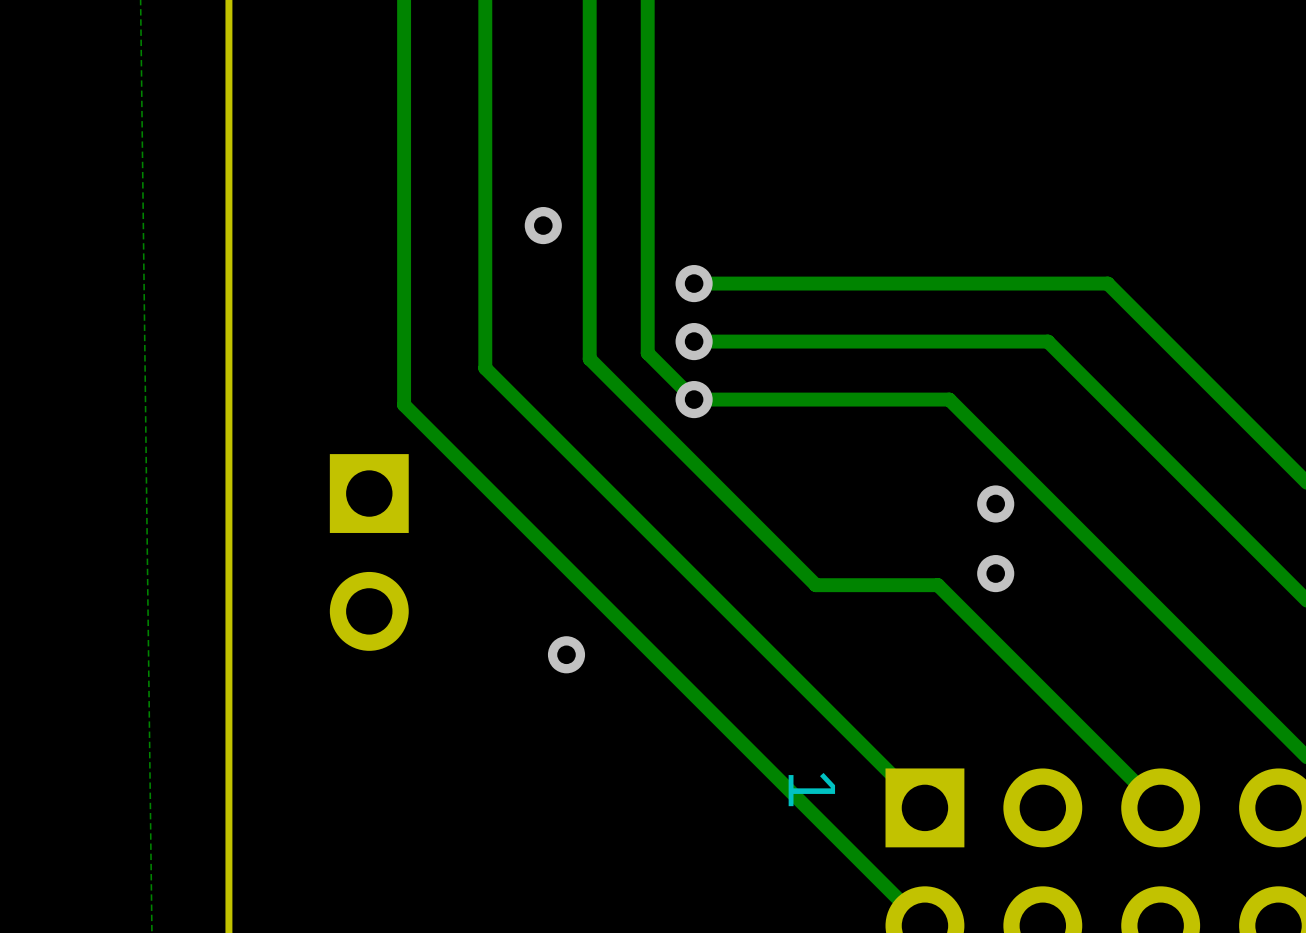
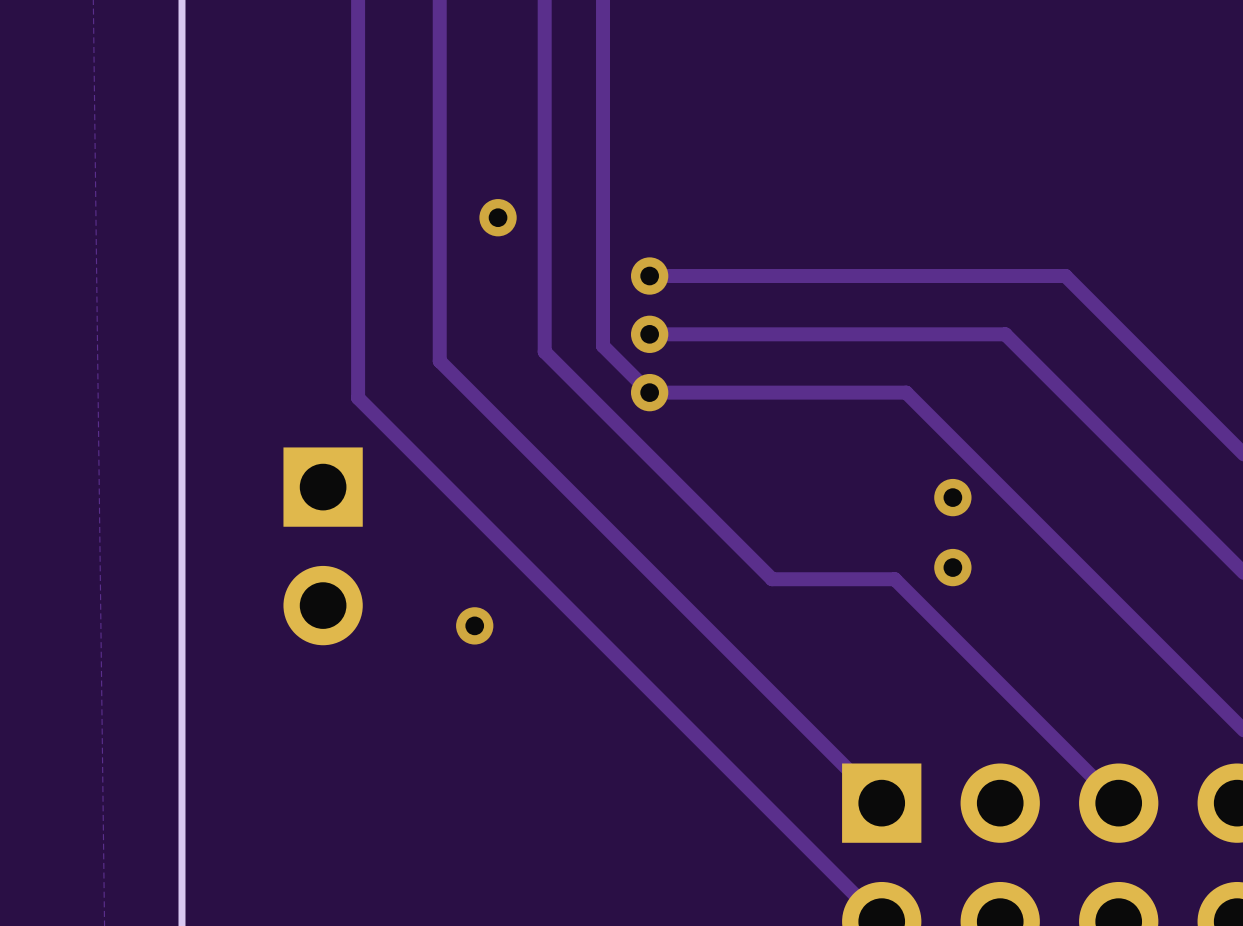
via position: (566, 654) -> (474, 625)
text: 1 (811, 789) -> none

